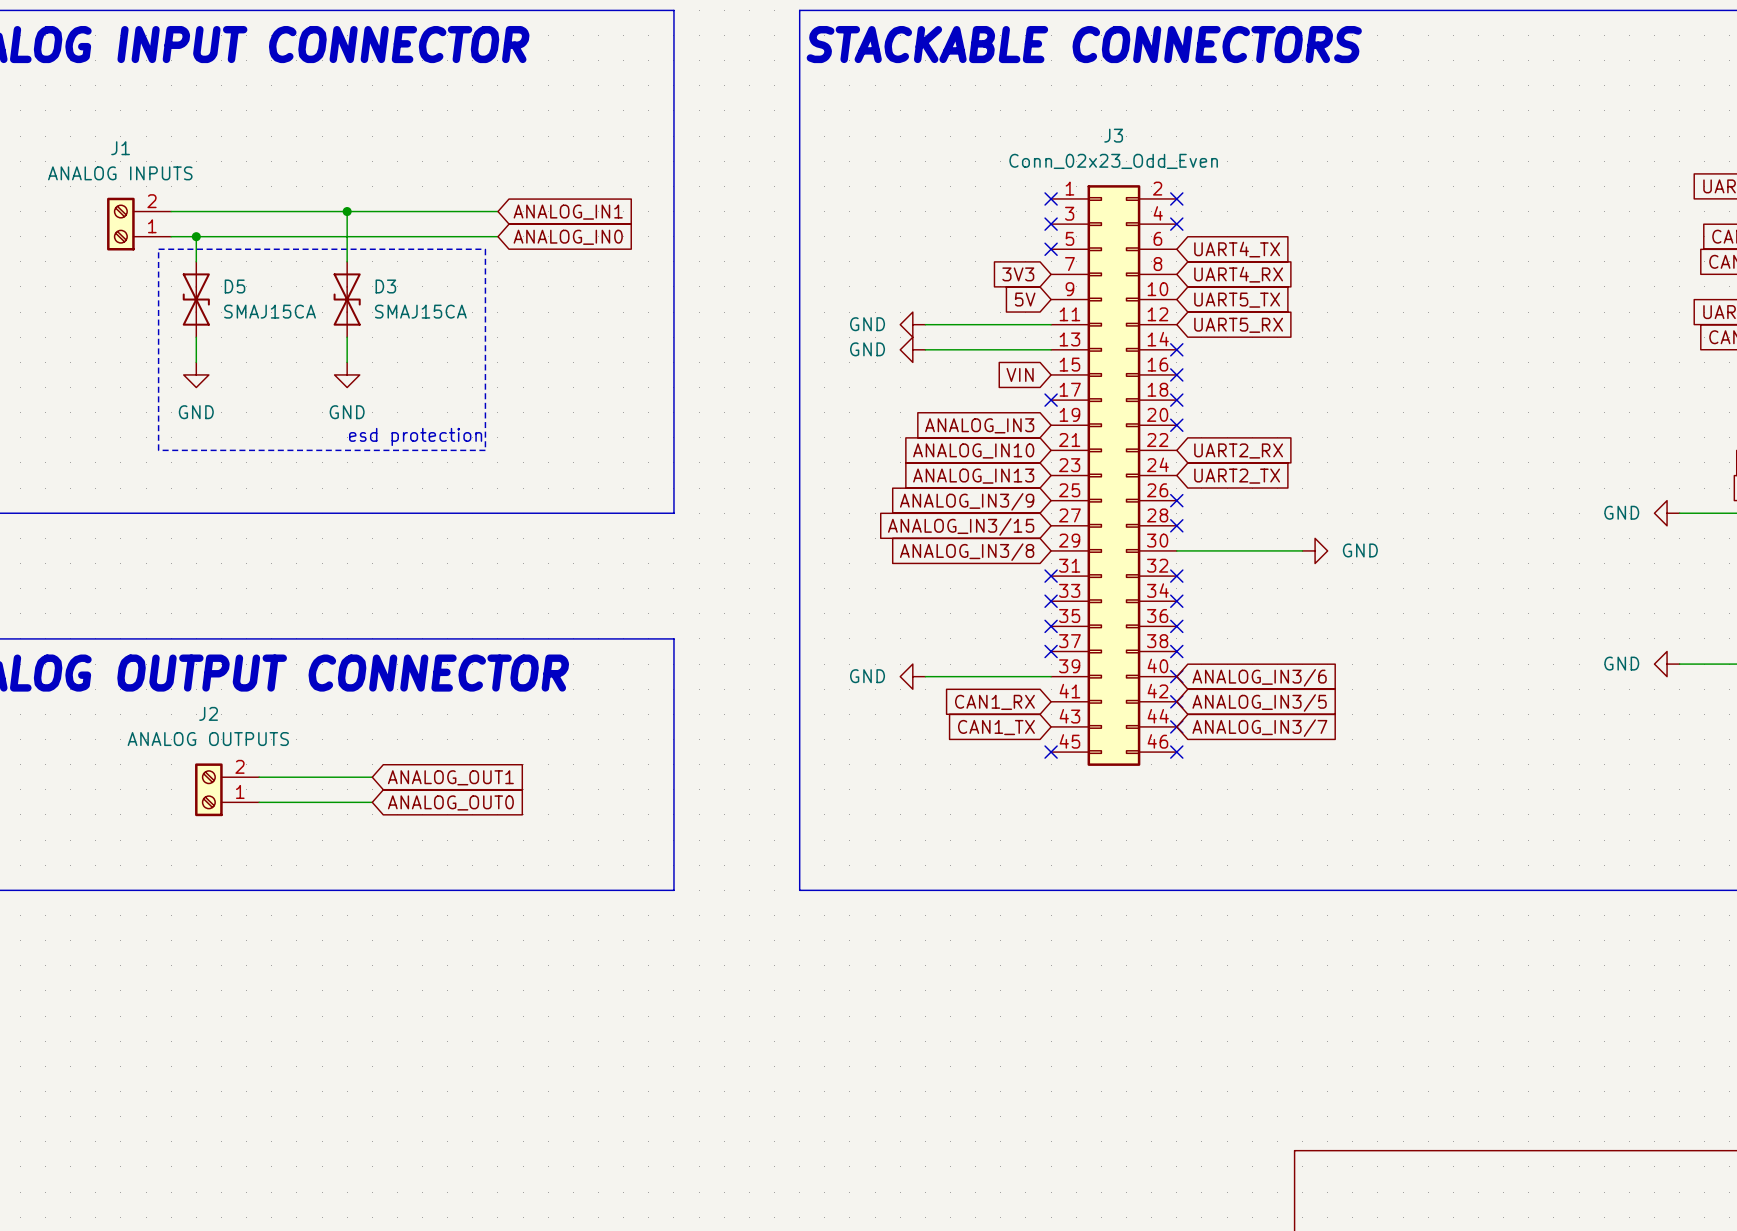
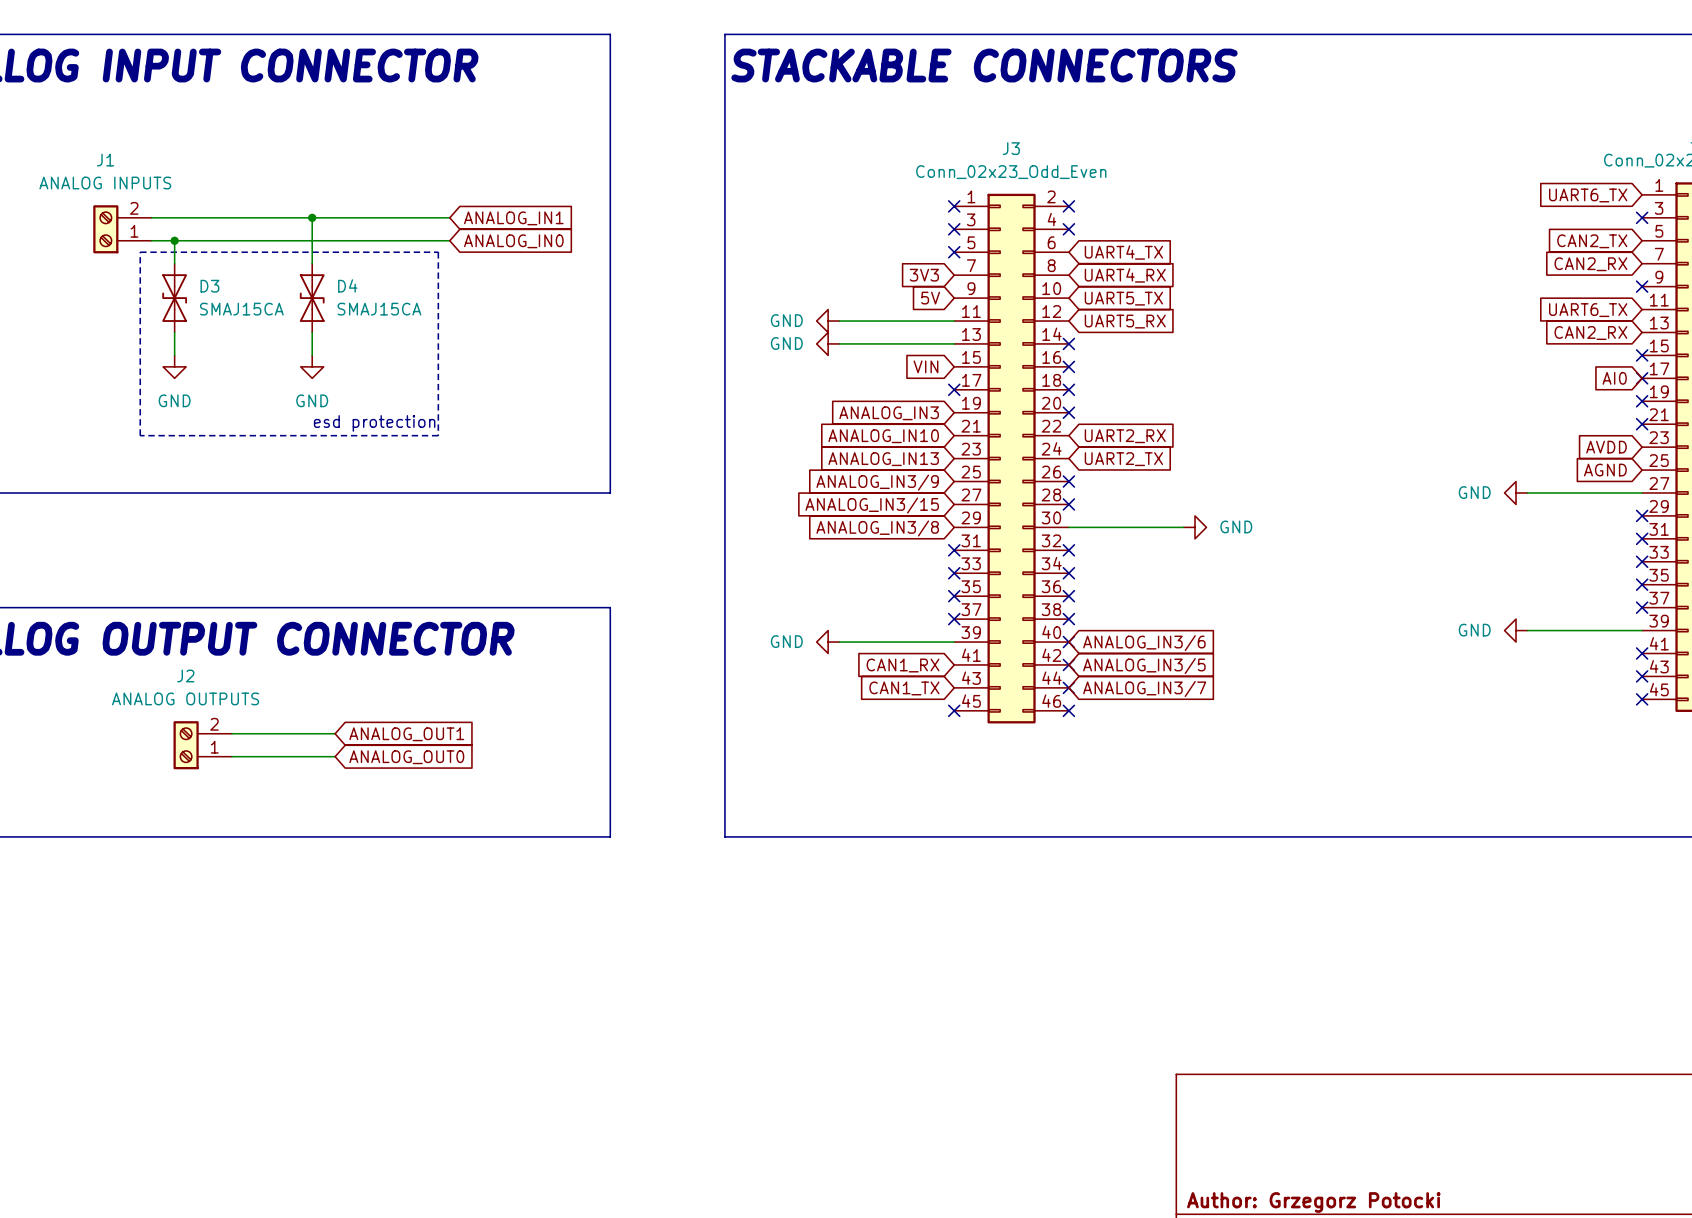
D5 name: D5 (235, 286) -> D3 (209, 286)
D3 name: D3 (385, 286) -> D4 (347, 285)

